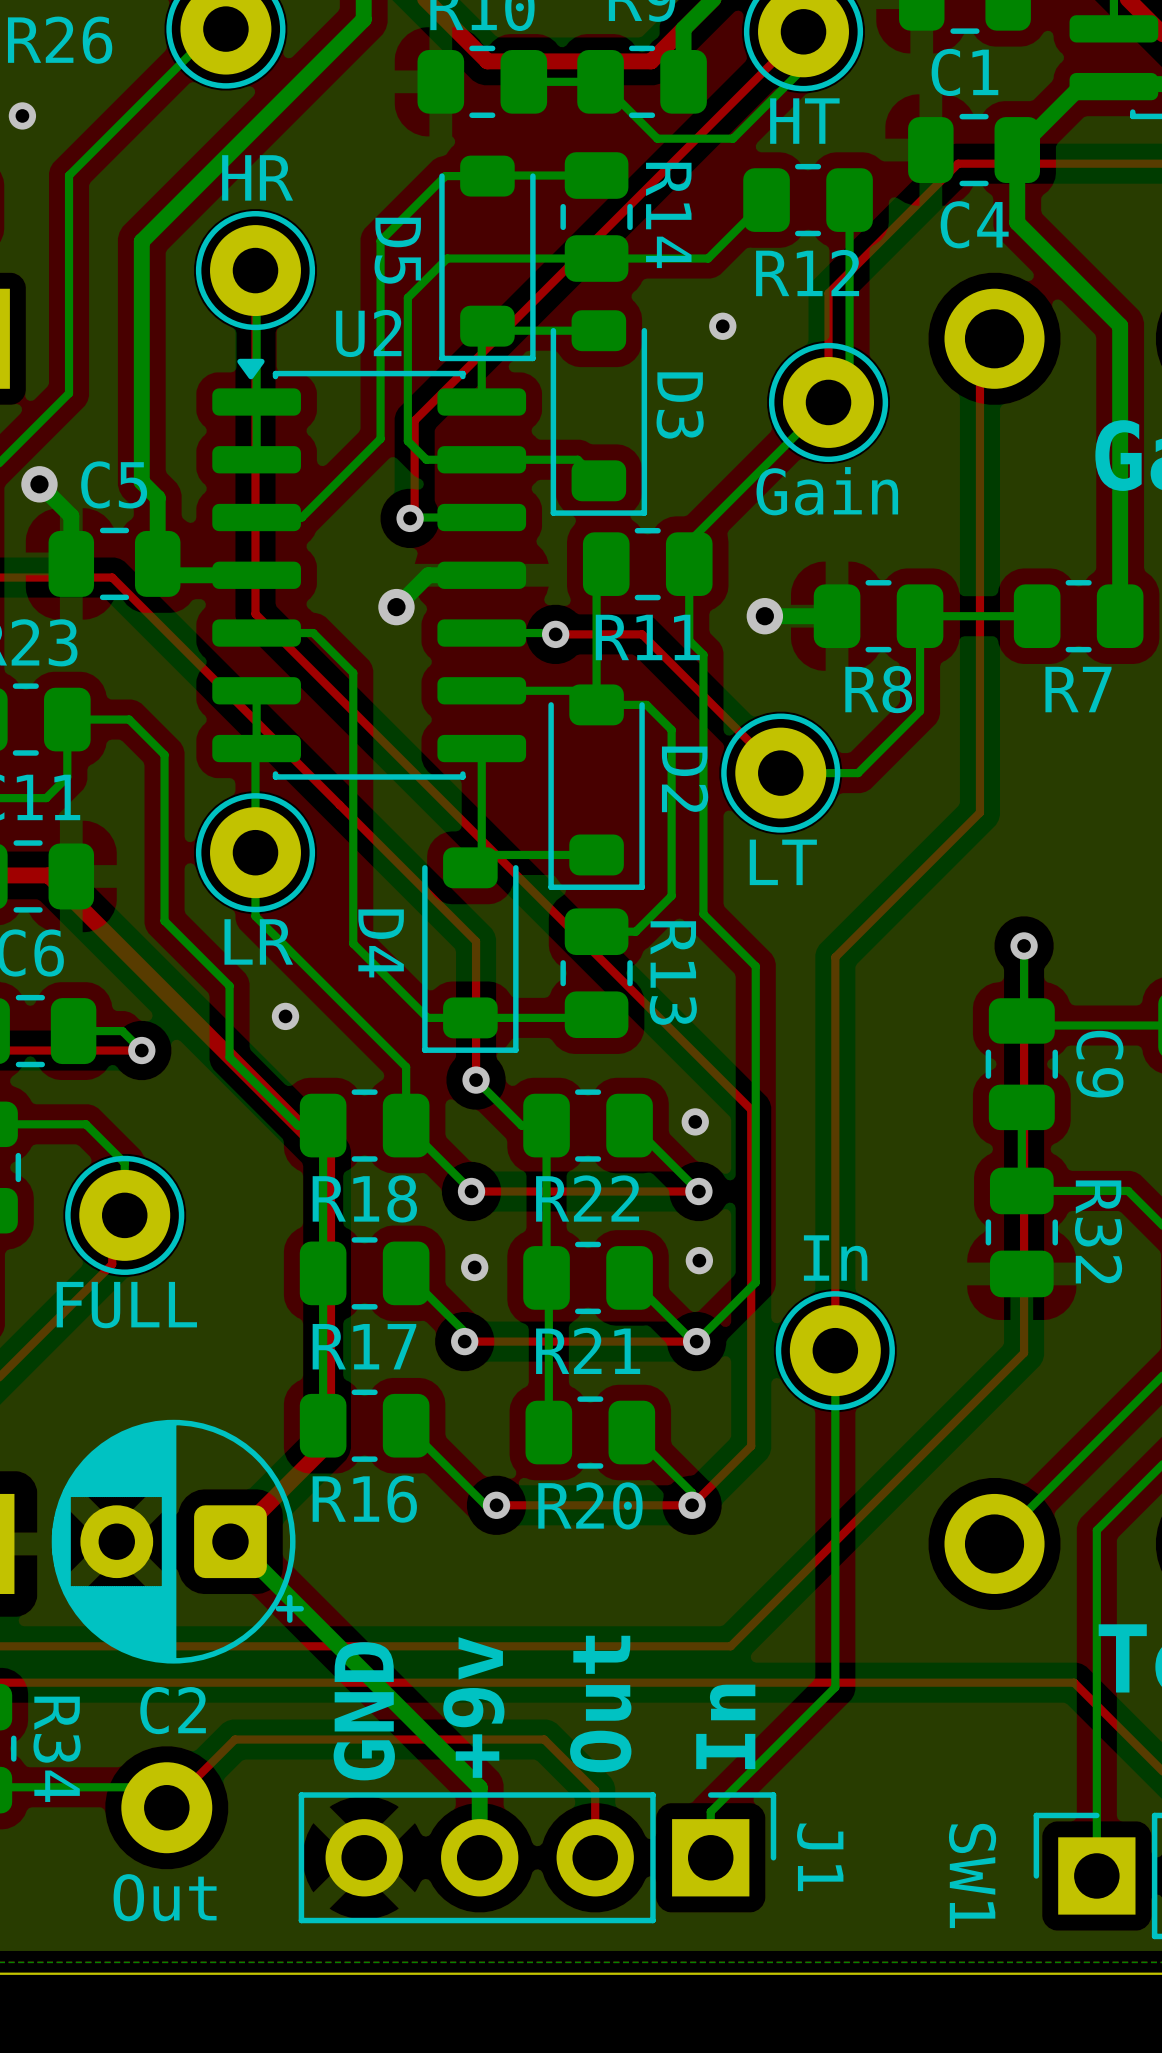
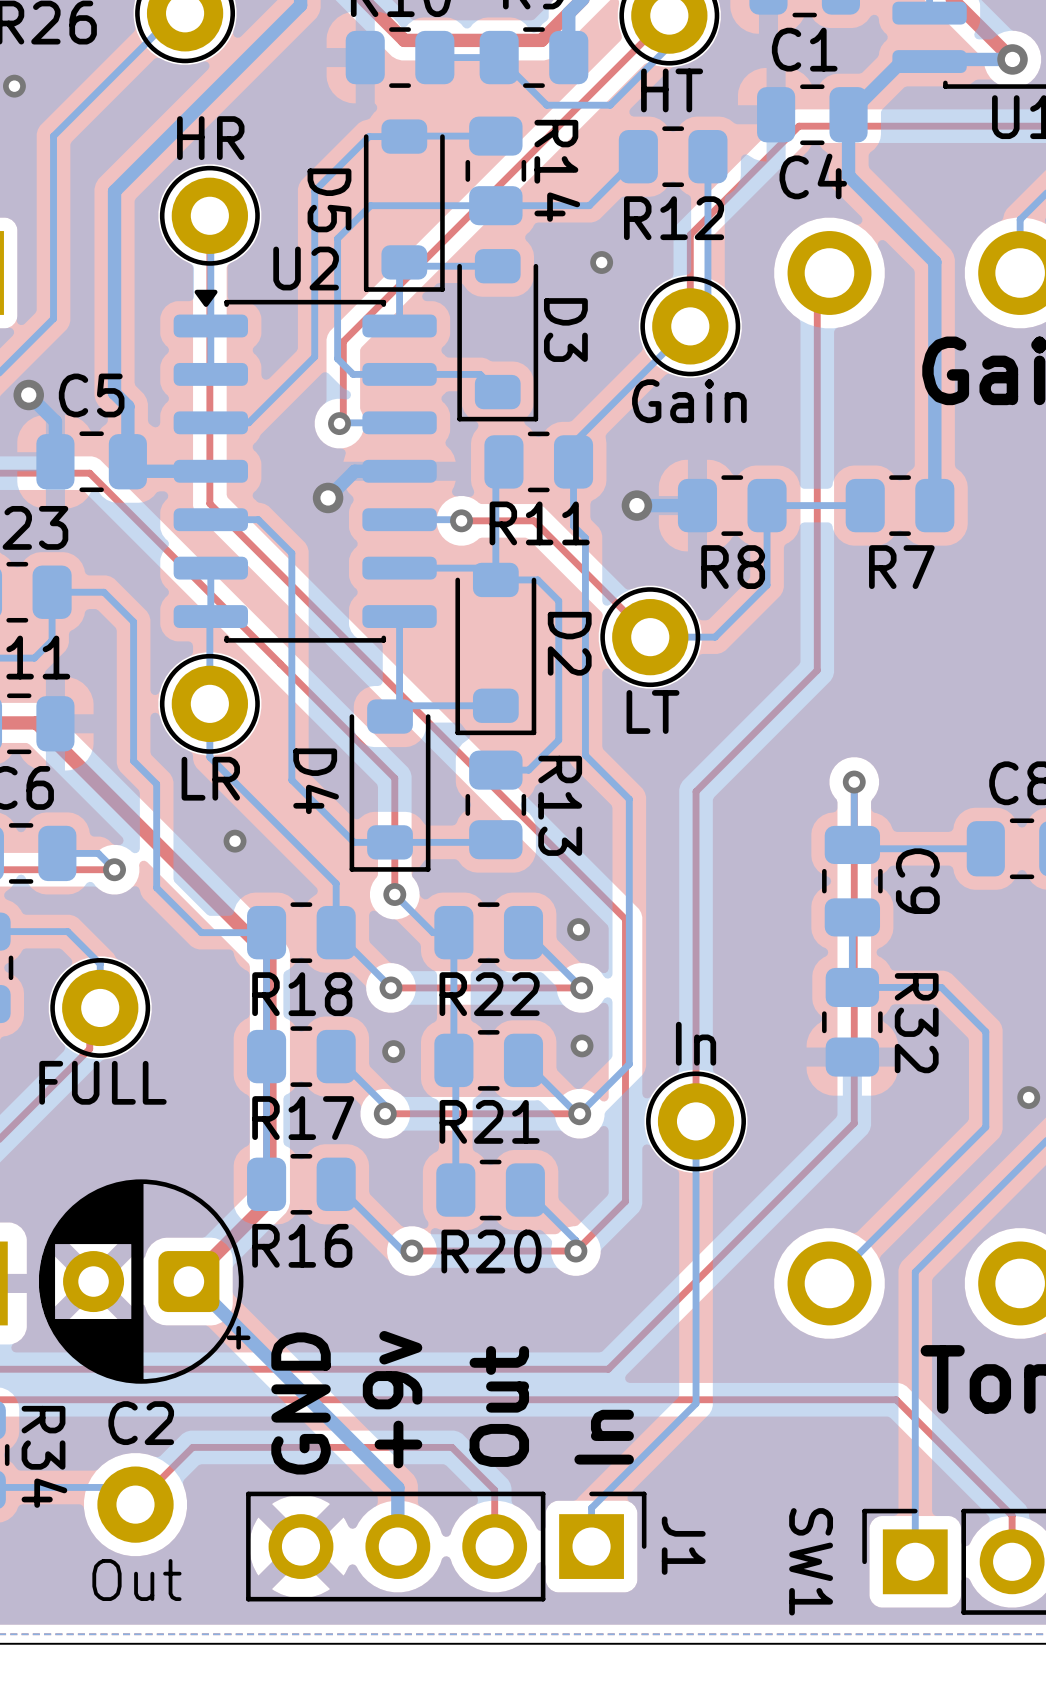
bottom track: (192, 948) (229, 985) (229, 1057) (297, 1125) -> (156, 784) (156, 887) (201, 932) (245, 932)

